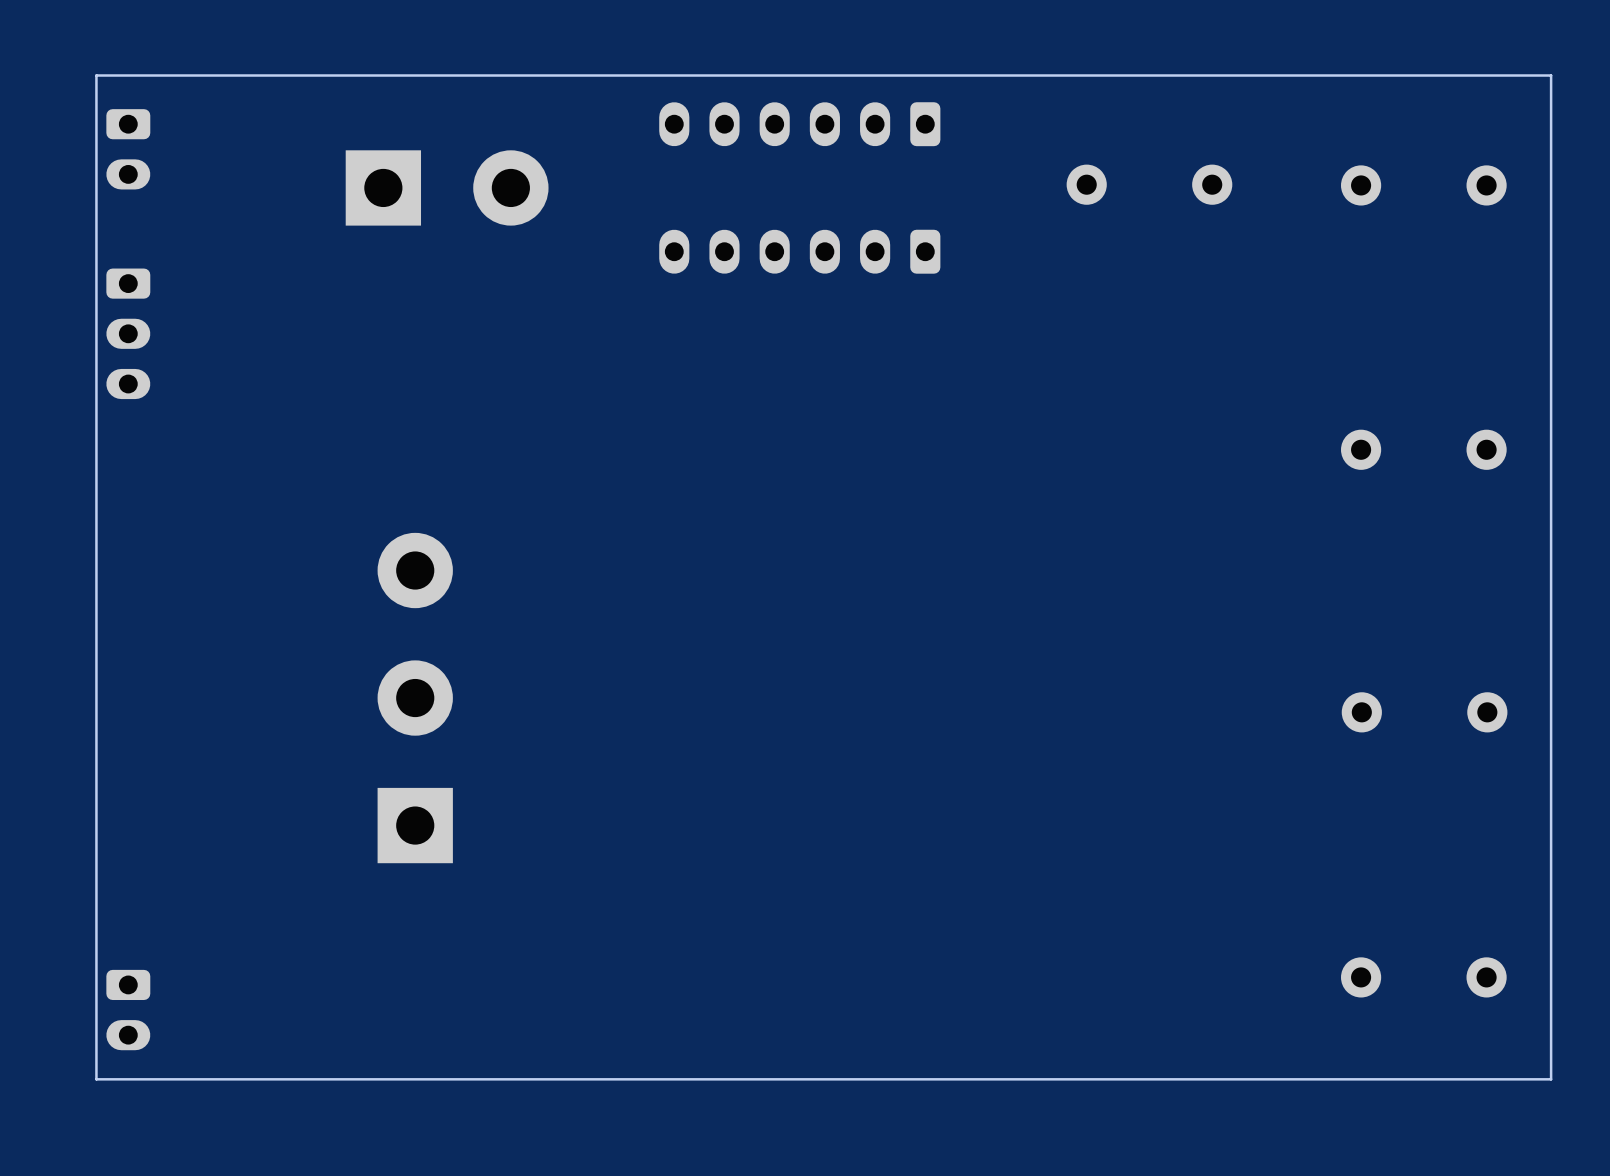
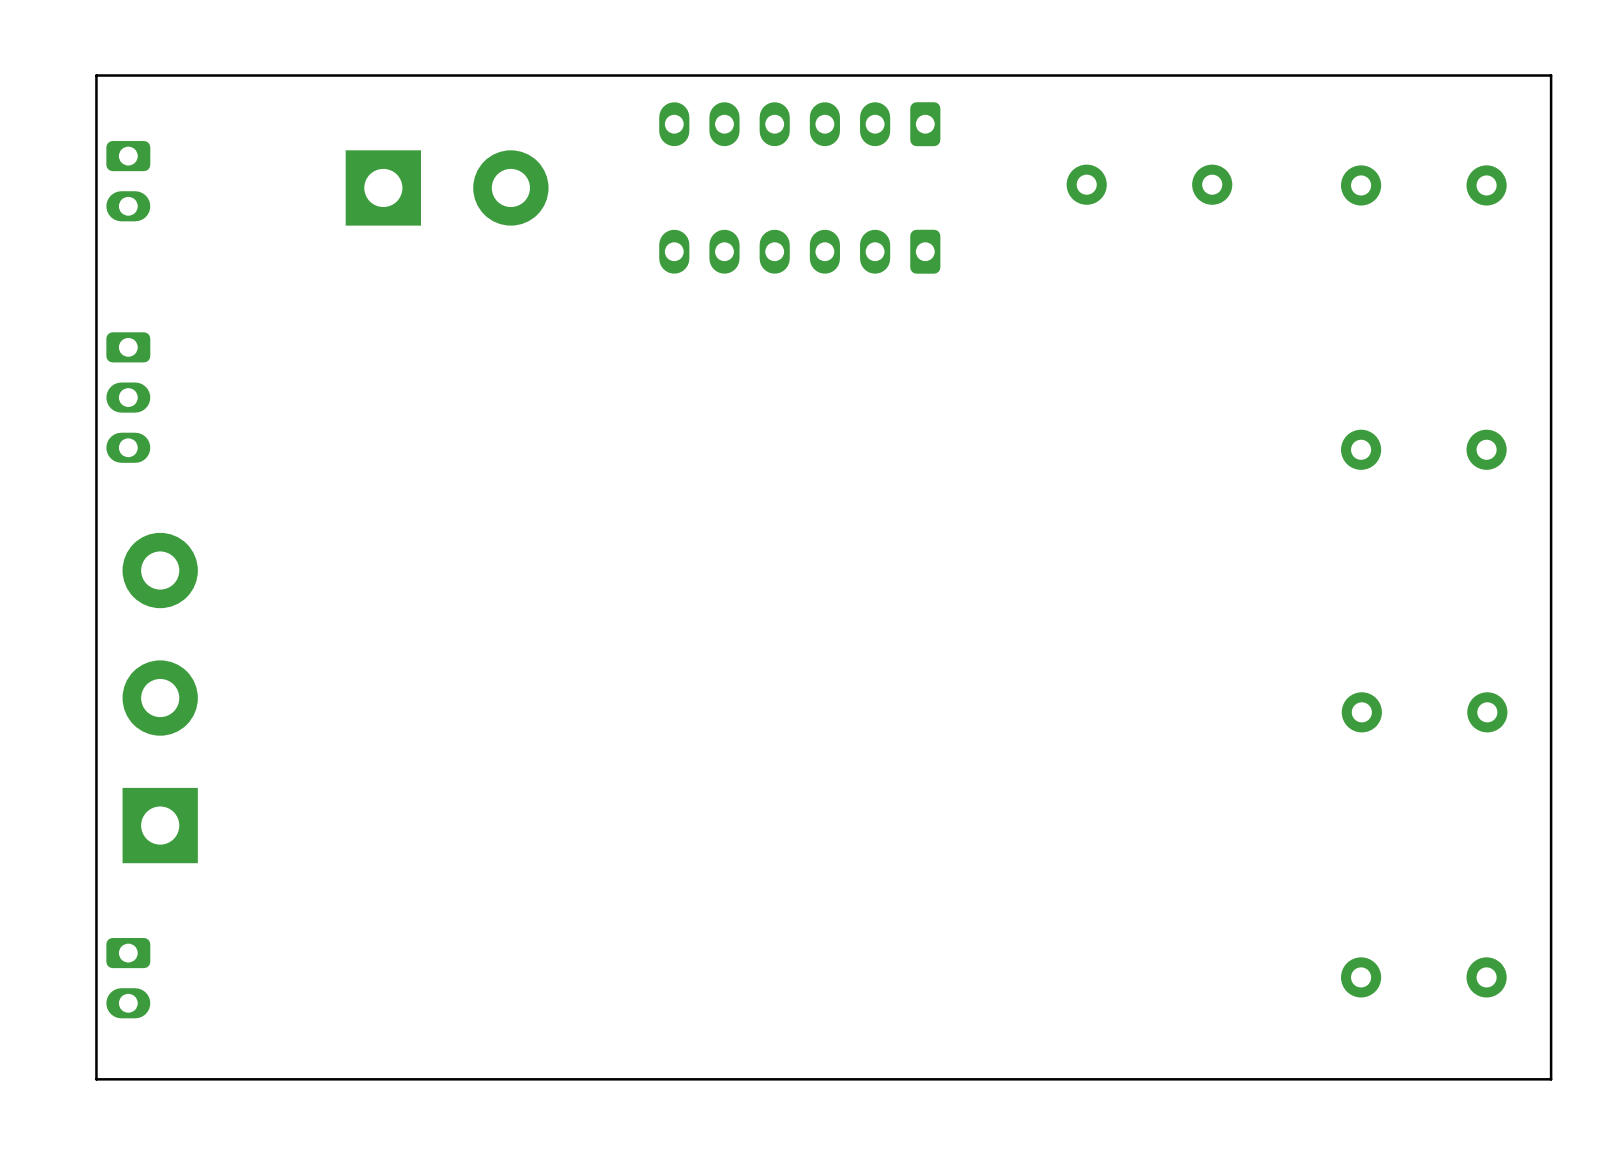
part position: (128, 149) -> (128, 181)
part position: (128, 333) -> (128, 397)
part position: (415, 698) -> (160, 698)
part position: (128, 1010) -> (128, 978)

